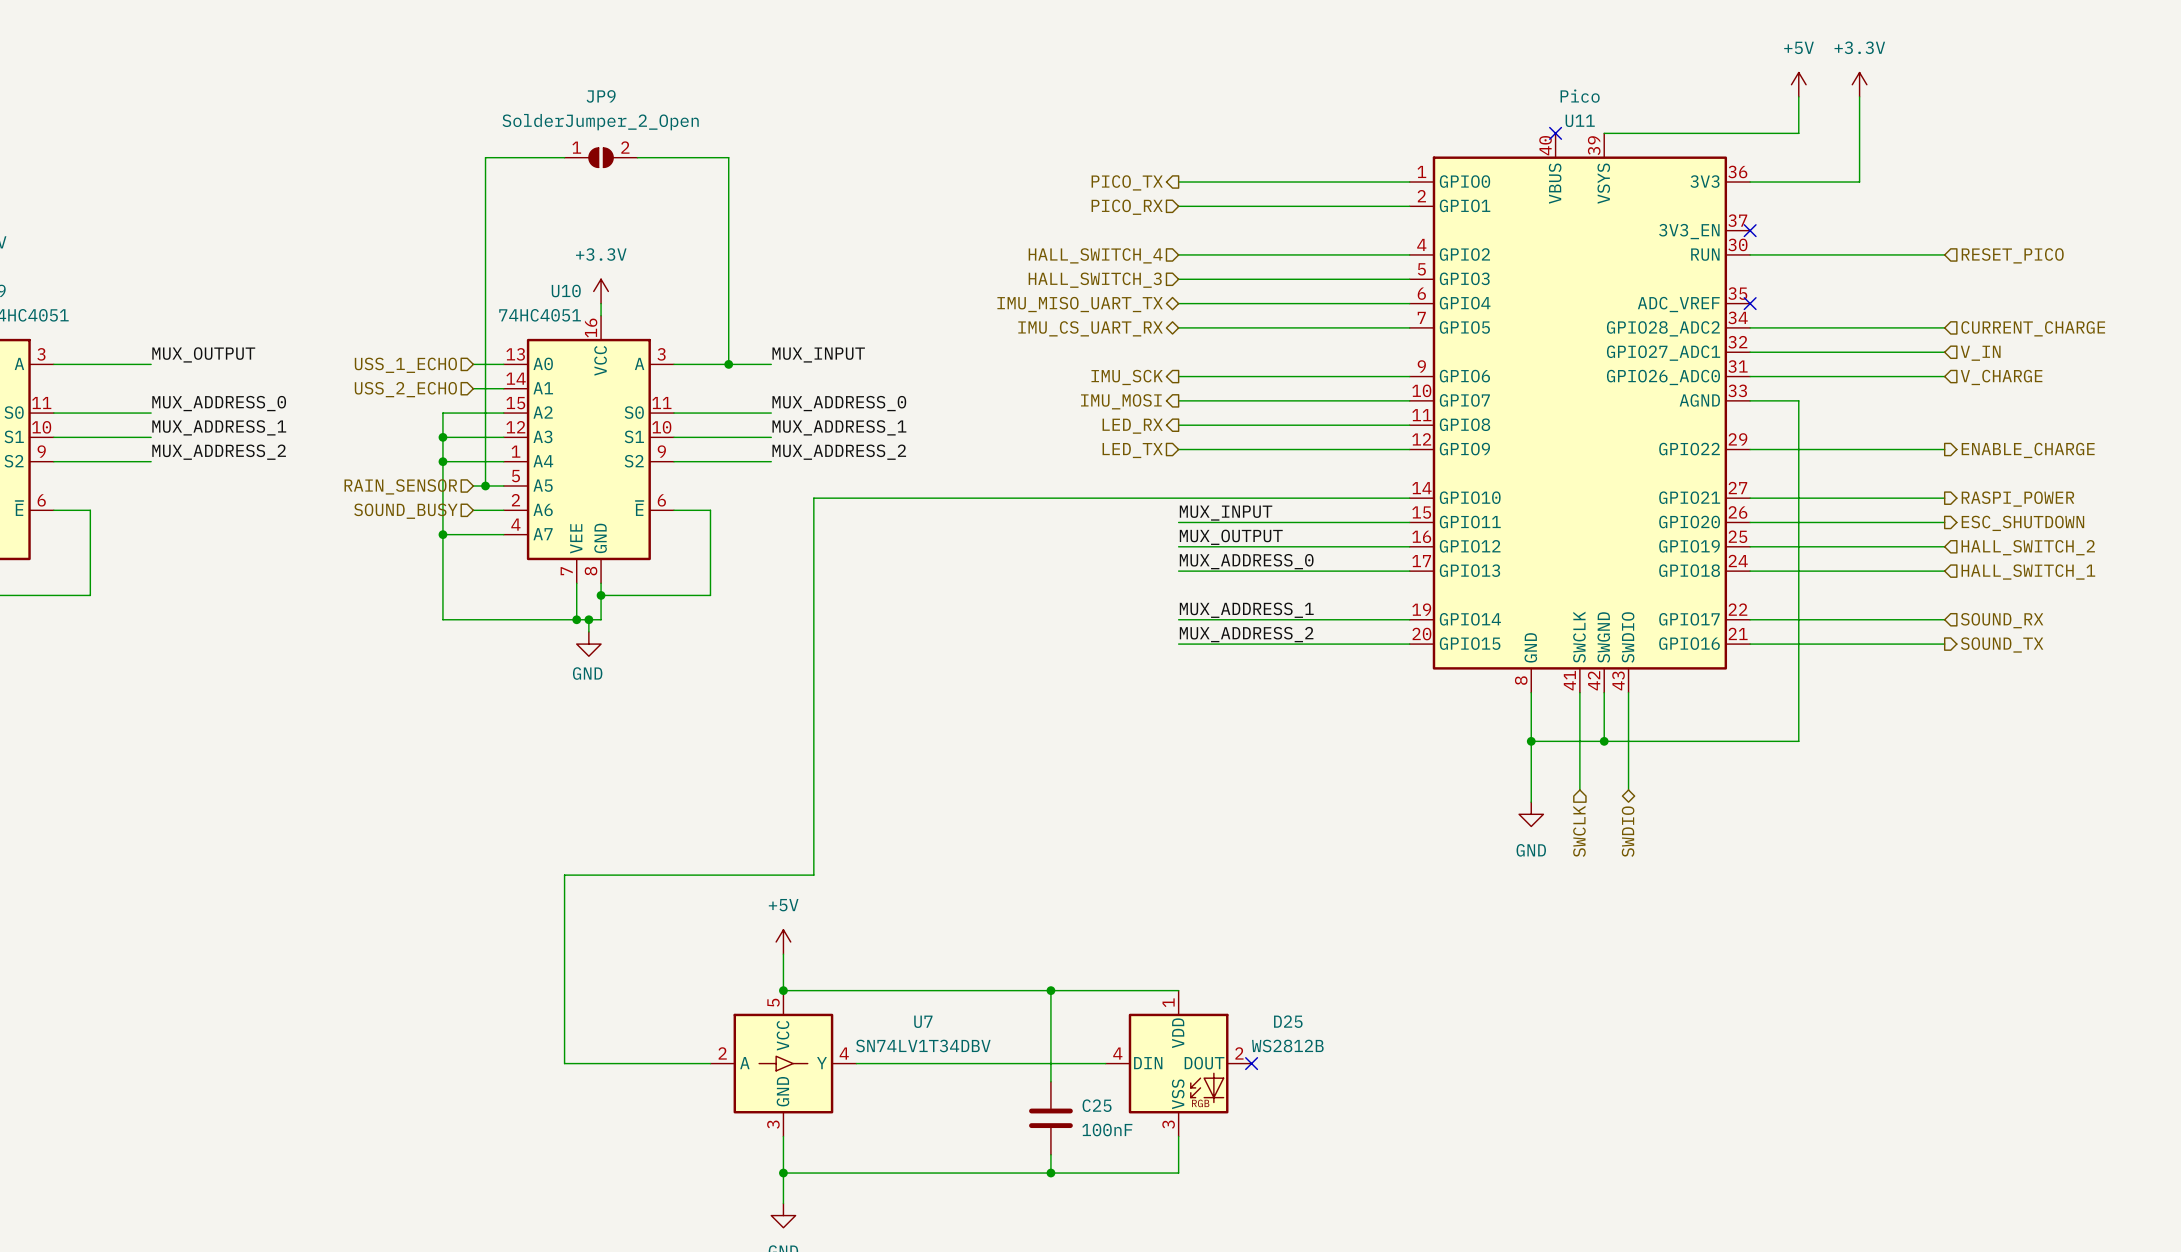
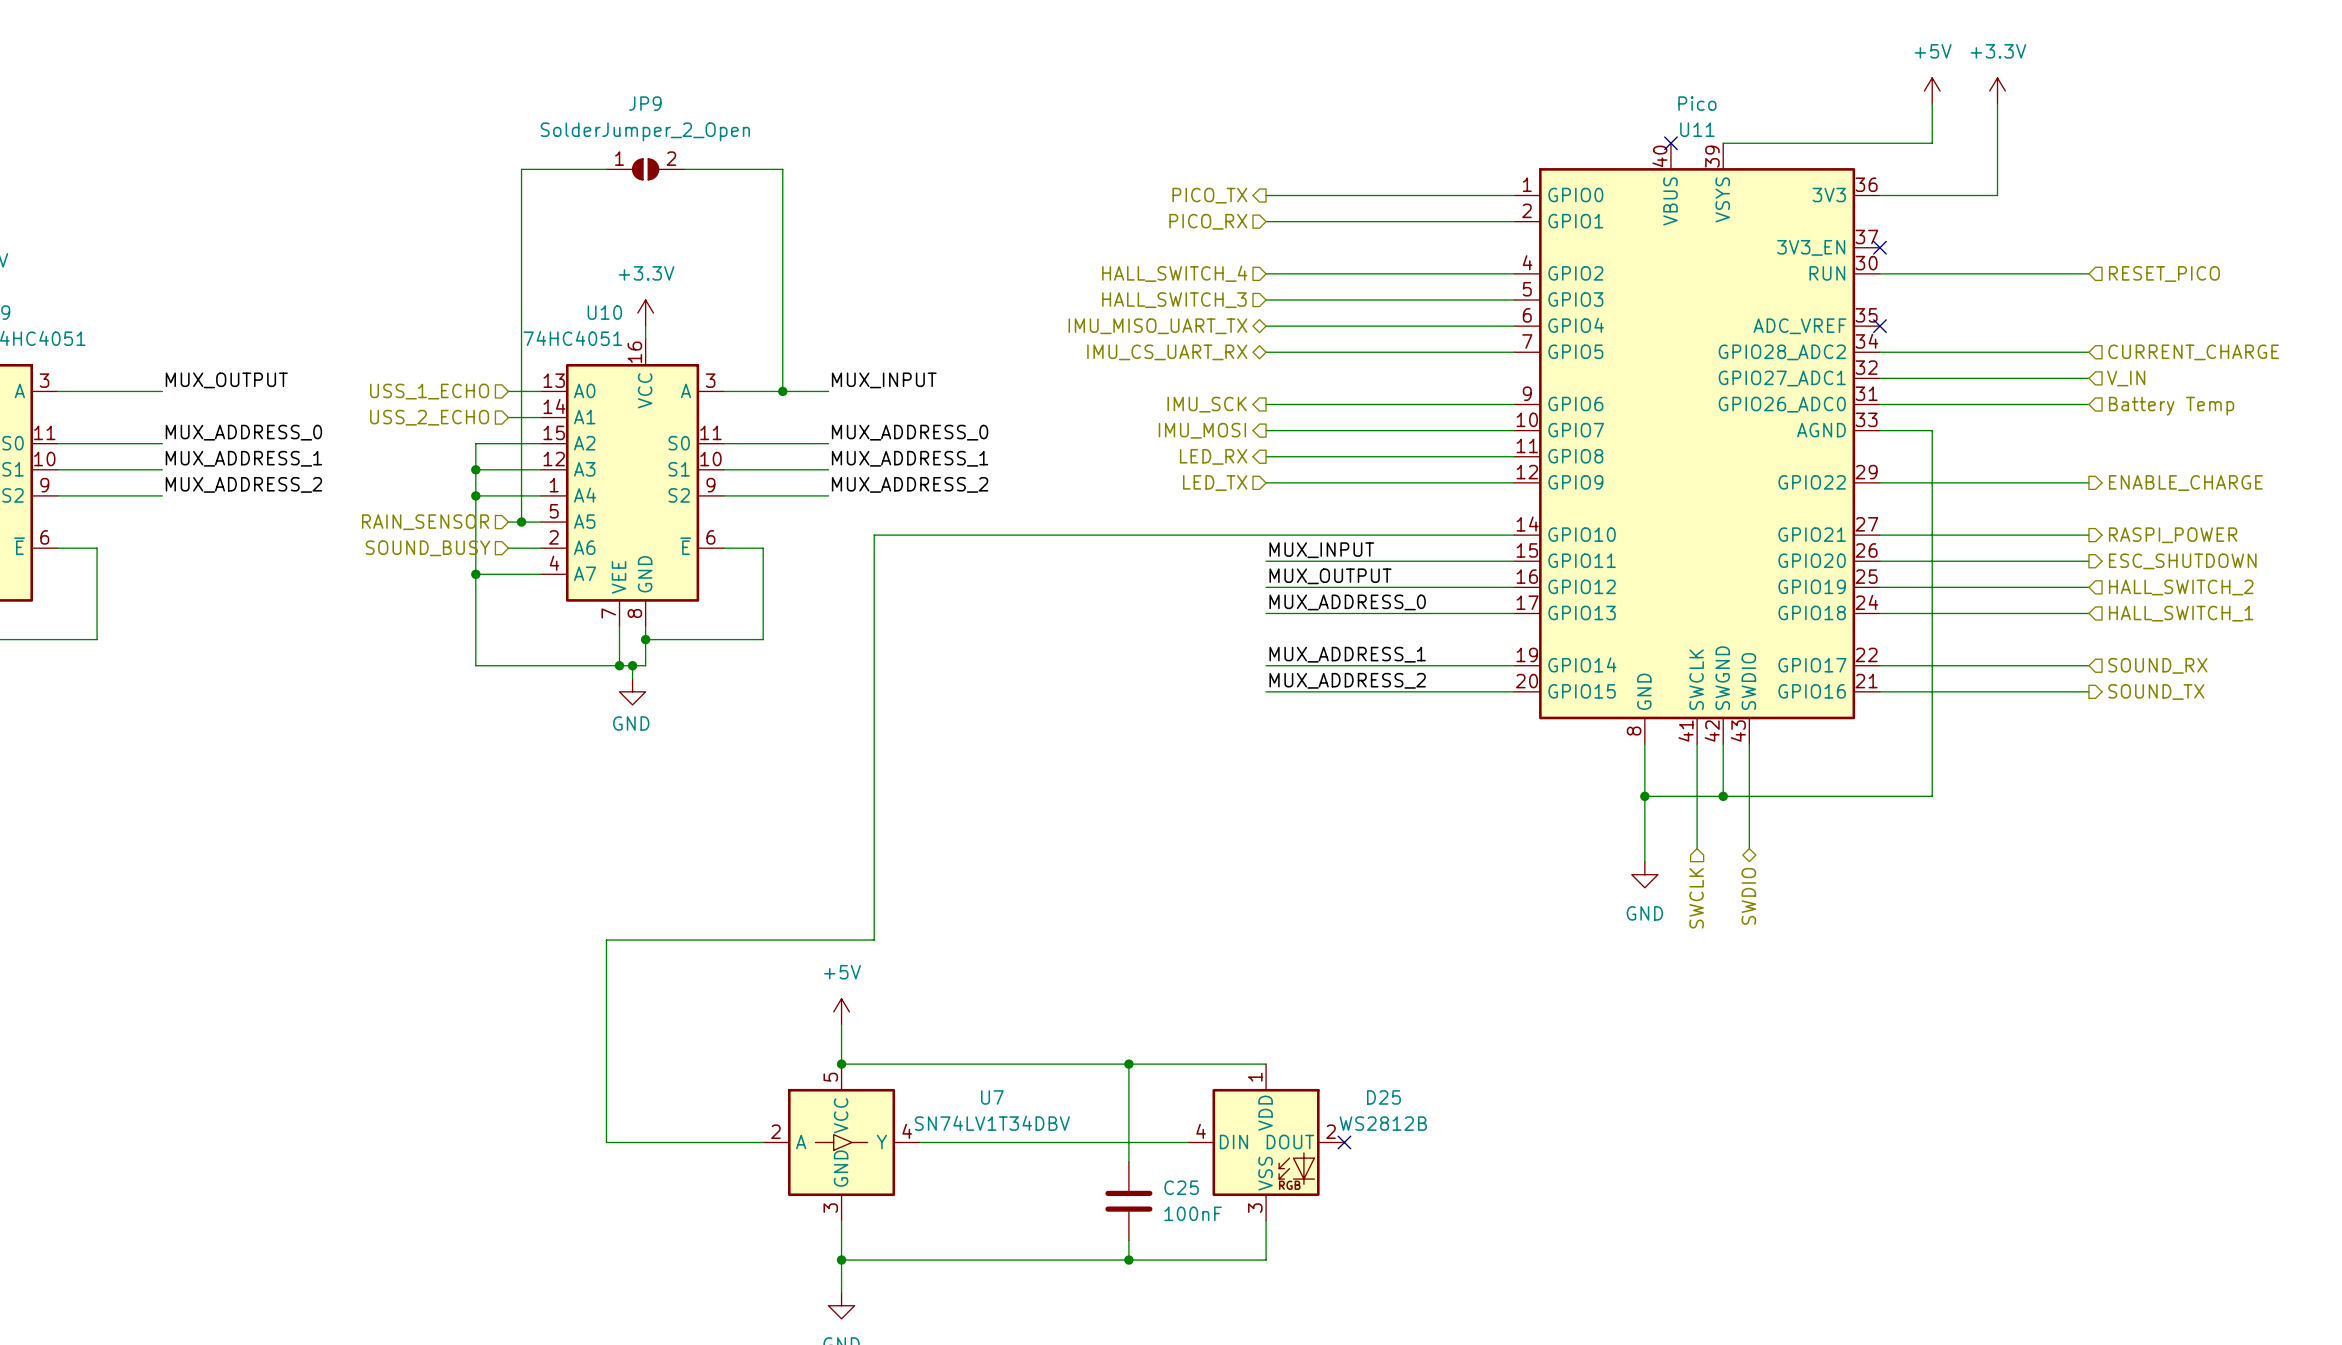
hierarchical label: V_CHARGE (2001, 377) -> Battery Temp (2171, 406)

